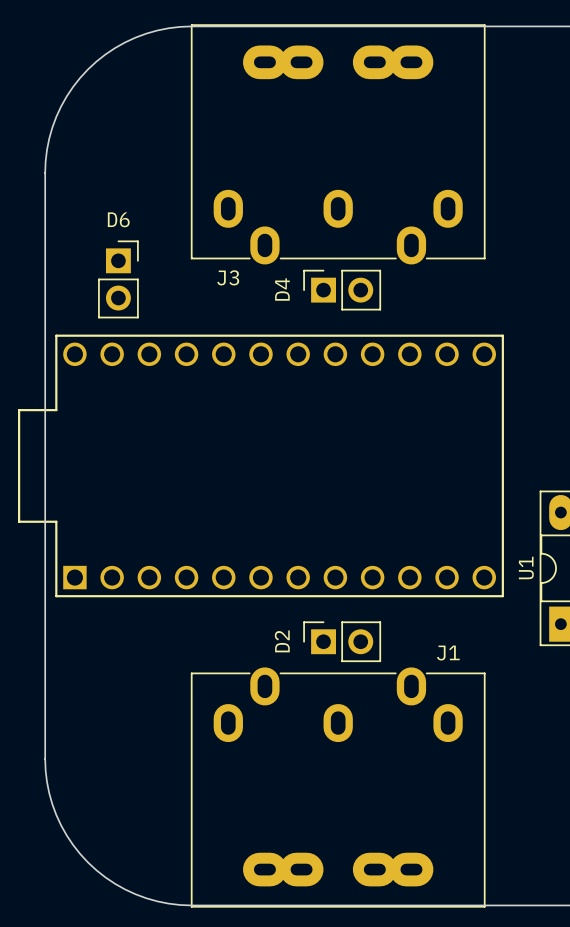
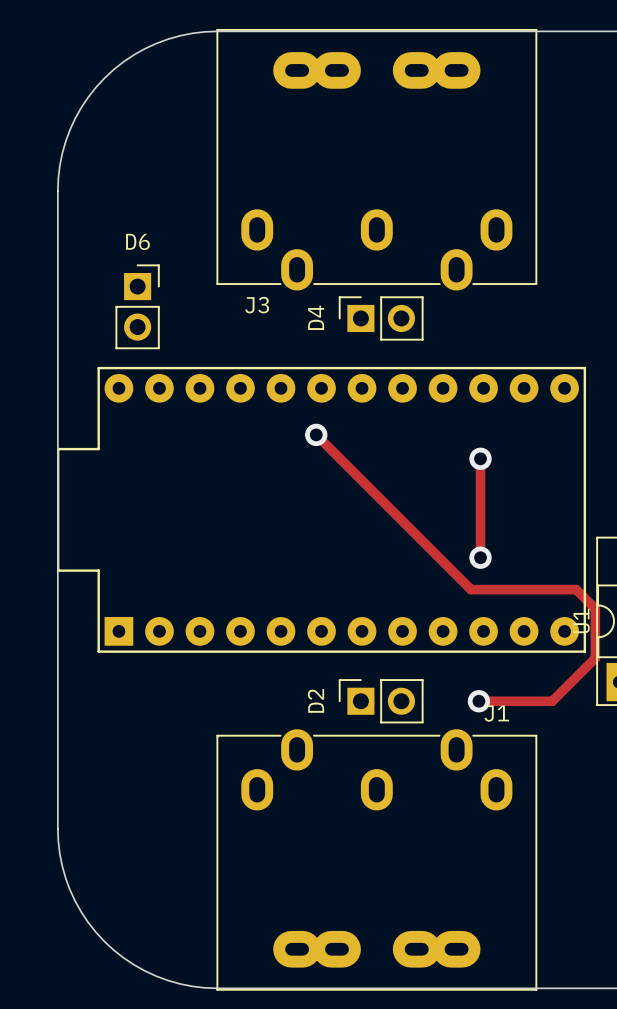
track: none -> (316, 434) (470, 589) (576, 589) (595, 608) (595, 658) (552, 701) (478, 701)
via: none -> (316, 434)
track: none -> (480, 458) (480, 557)
via: none -> (480, 458)
part: (260, 465) -> none
part: none -> (321, 509)
via: none -> (480, 557)
via: none -> (478, 701)

